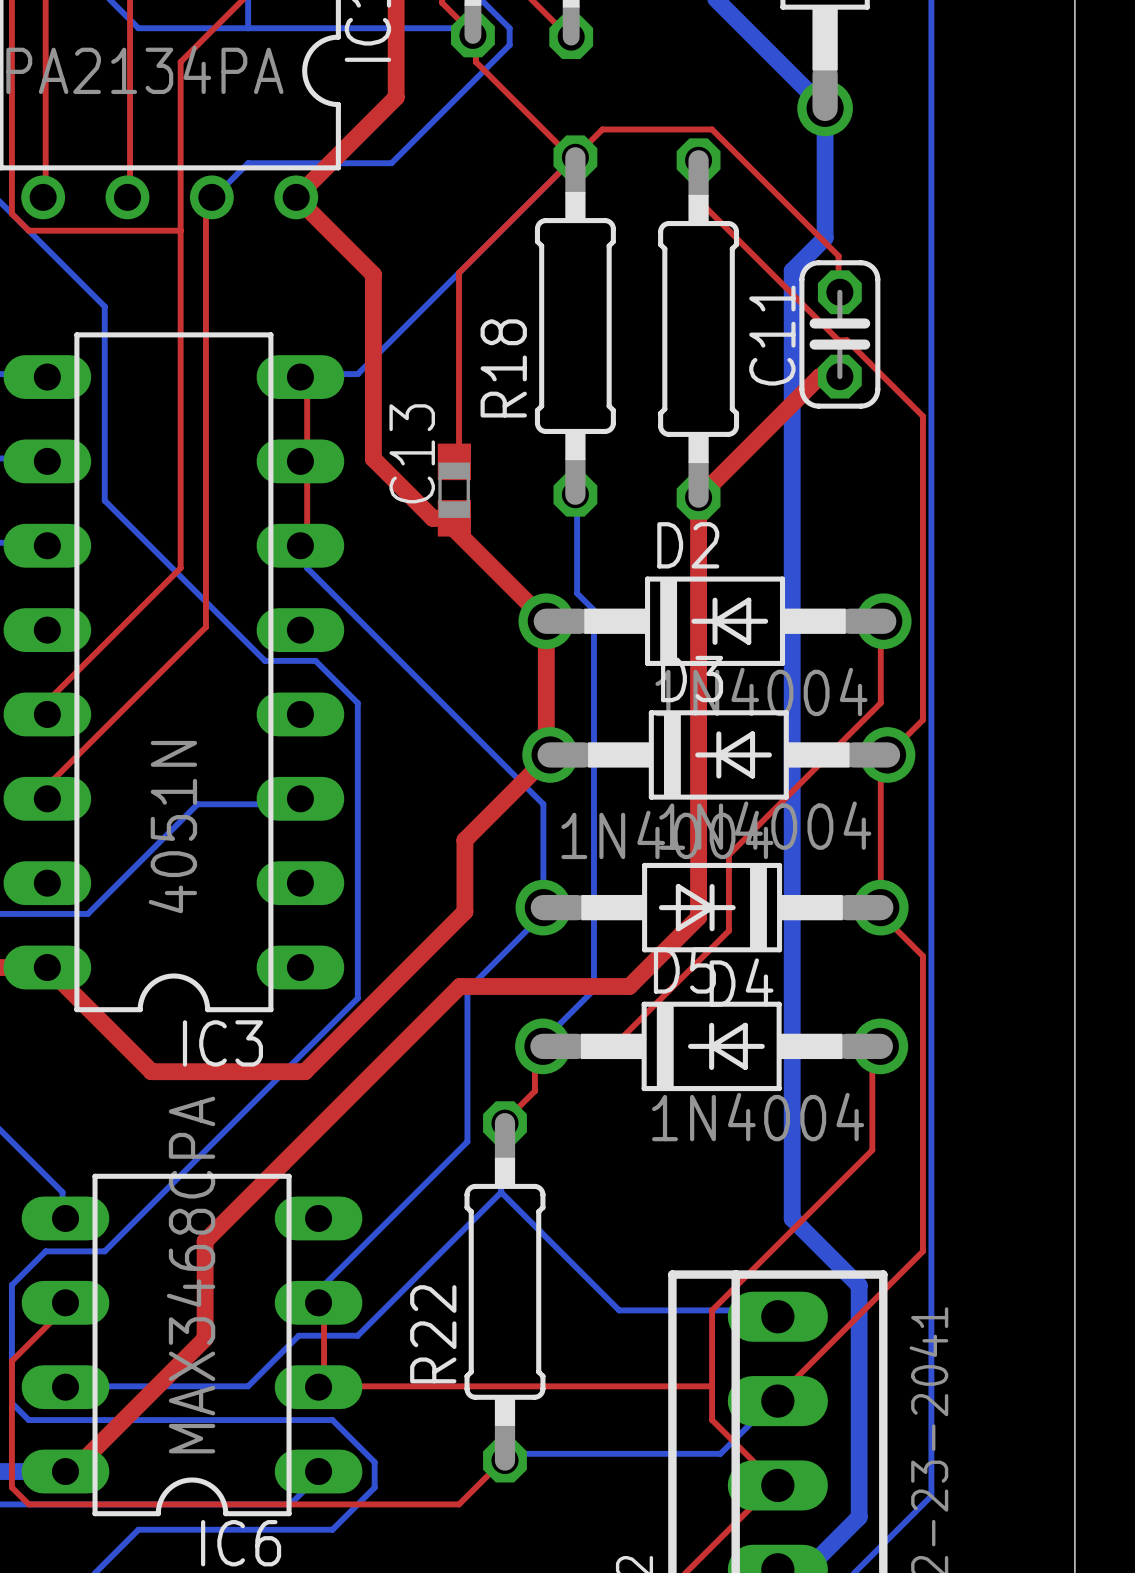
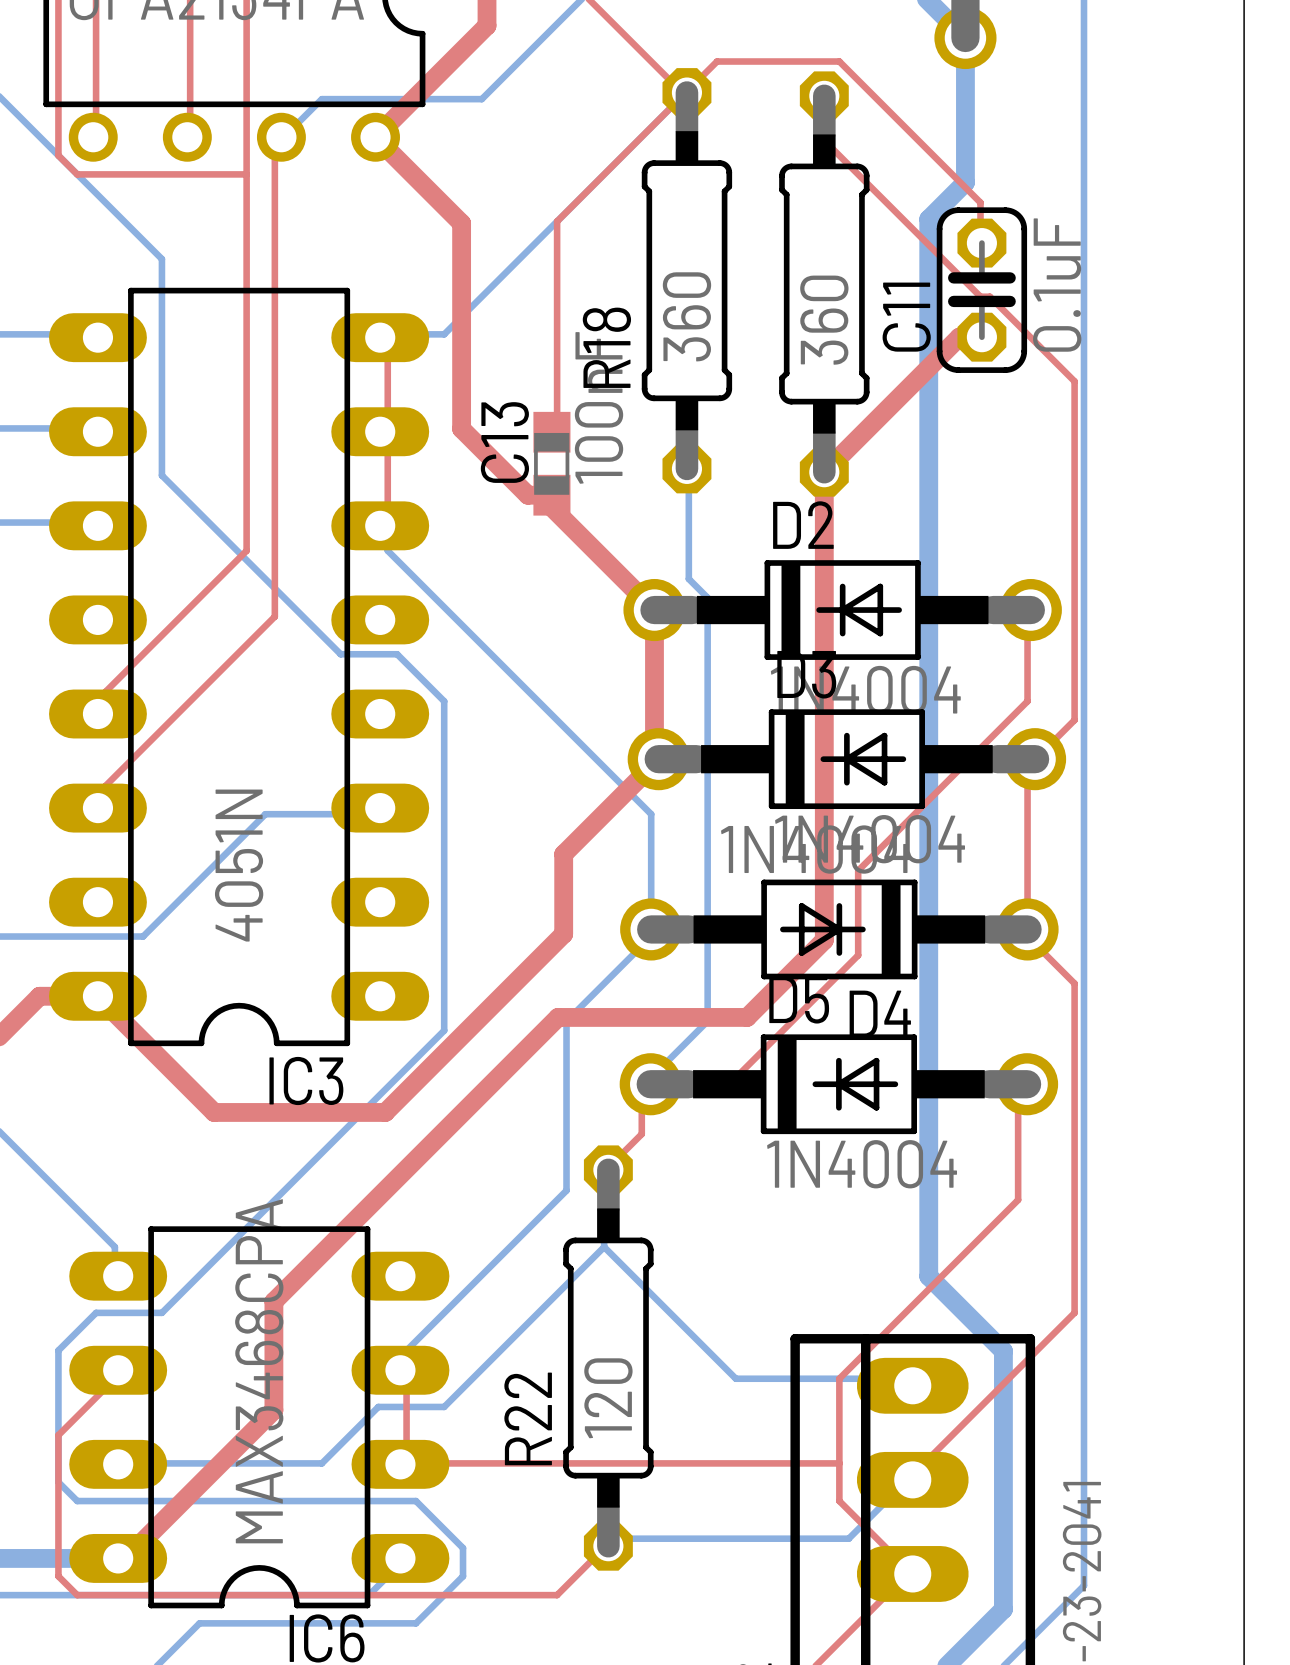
C11 value: none -> 0.1uF (1057, 285)
R18 value: none -> 360 (686, 316)
part value: none -> 360 (824, 320)
C13 value: none -> 100nF (599, 407)
R22 value: none -> 120 (608, 1398)

